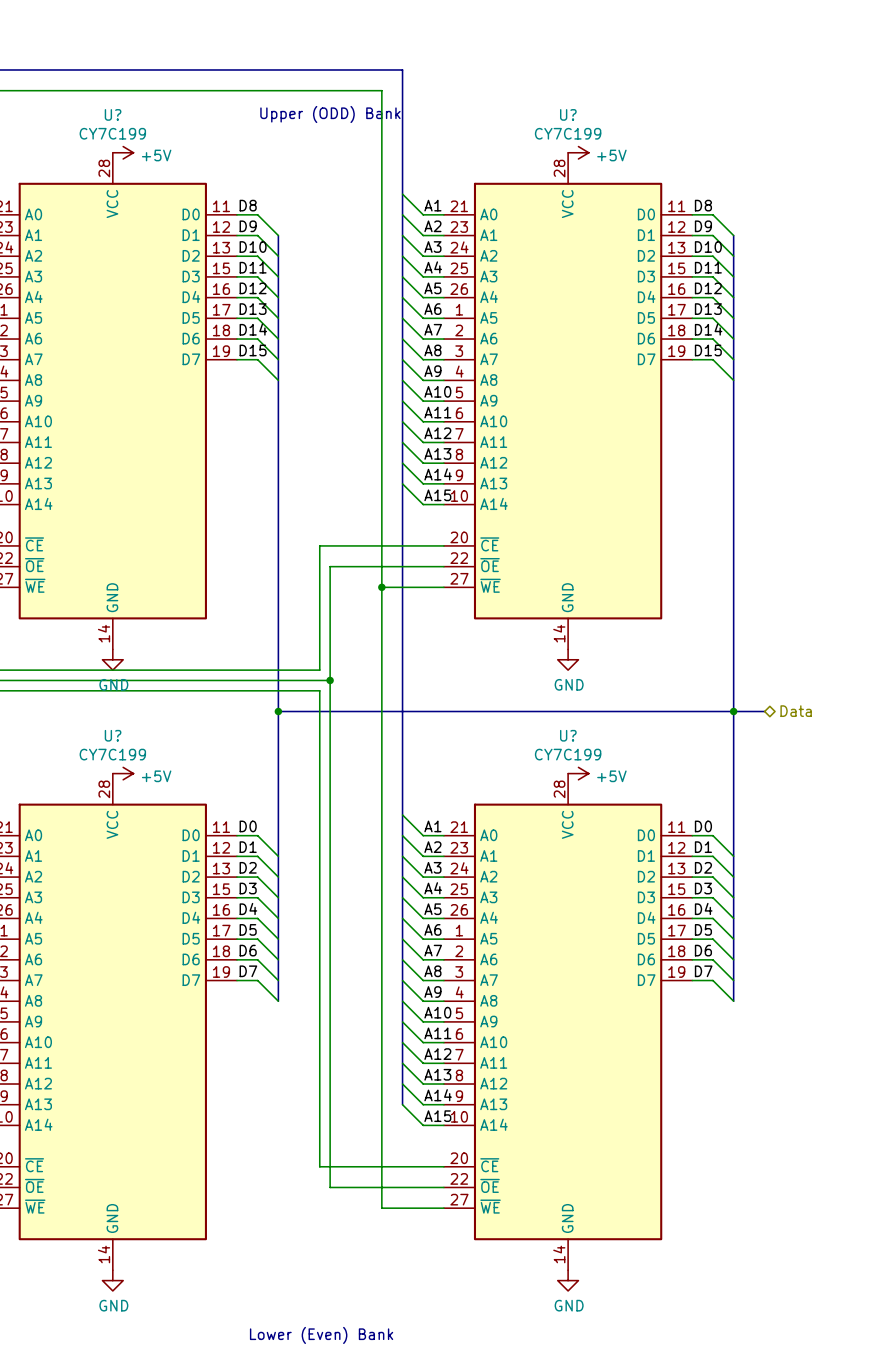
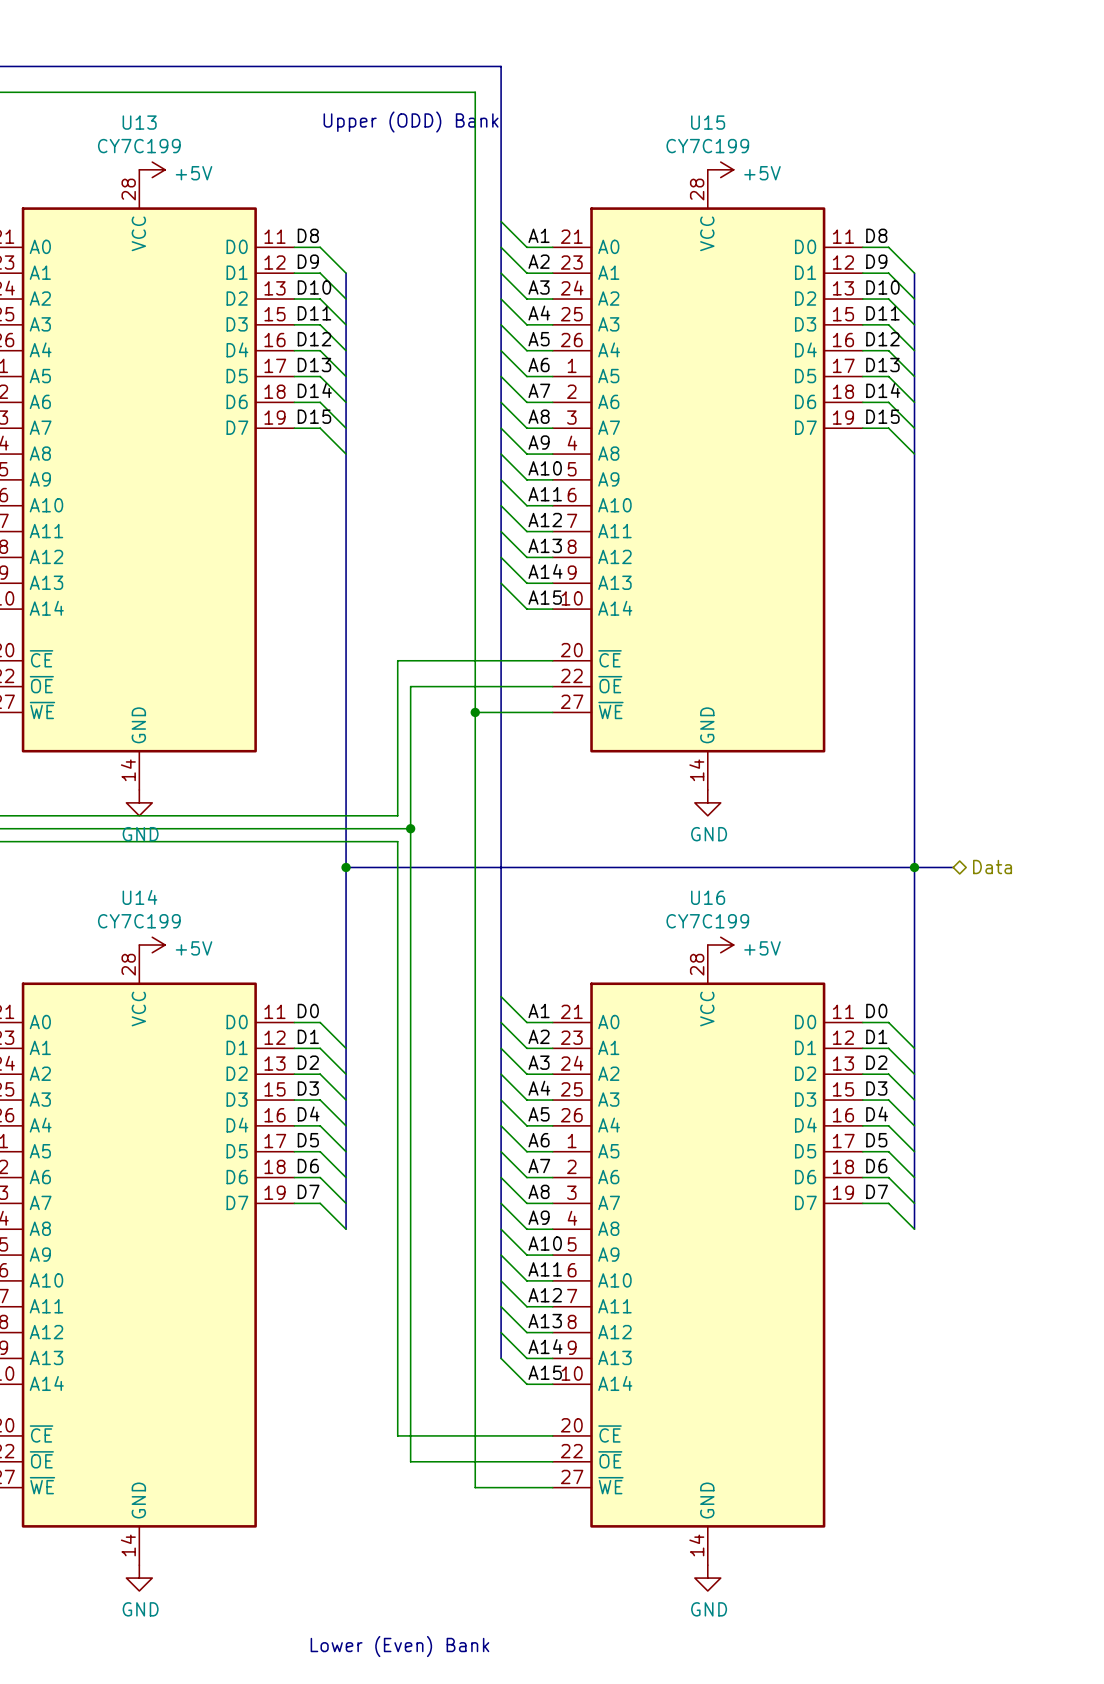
U? name: U? (113, 114) -> U13 (139, 122)
U? name: U? (568, 114) -> U15 (708, 122)
U? name: U? (113, 735) -> U14 (139, 897)
U? name: U? (568, 735) -> U16 (708, 897)

